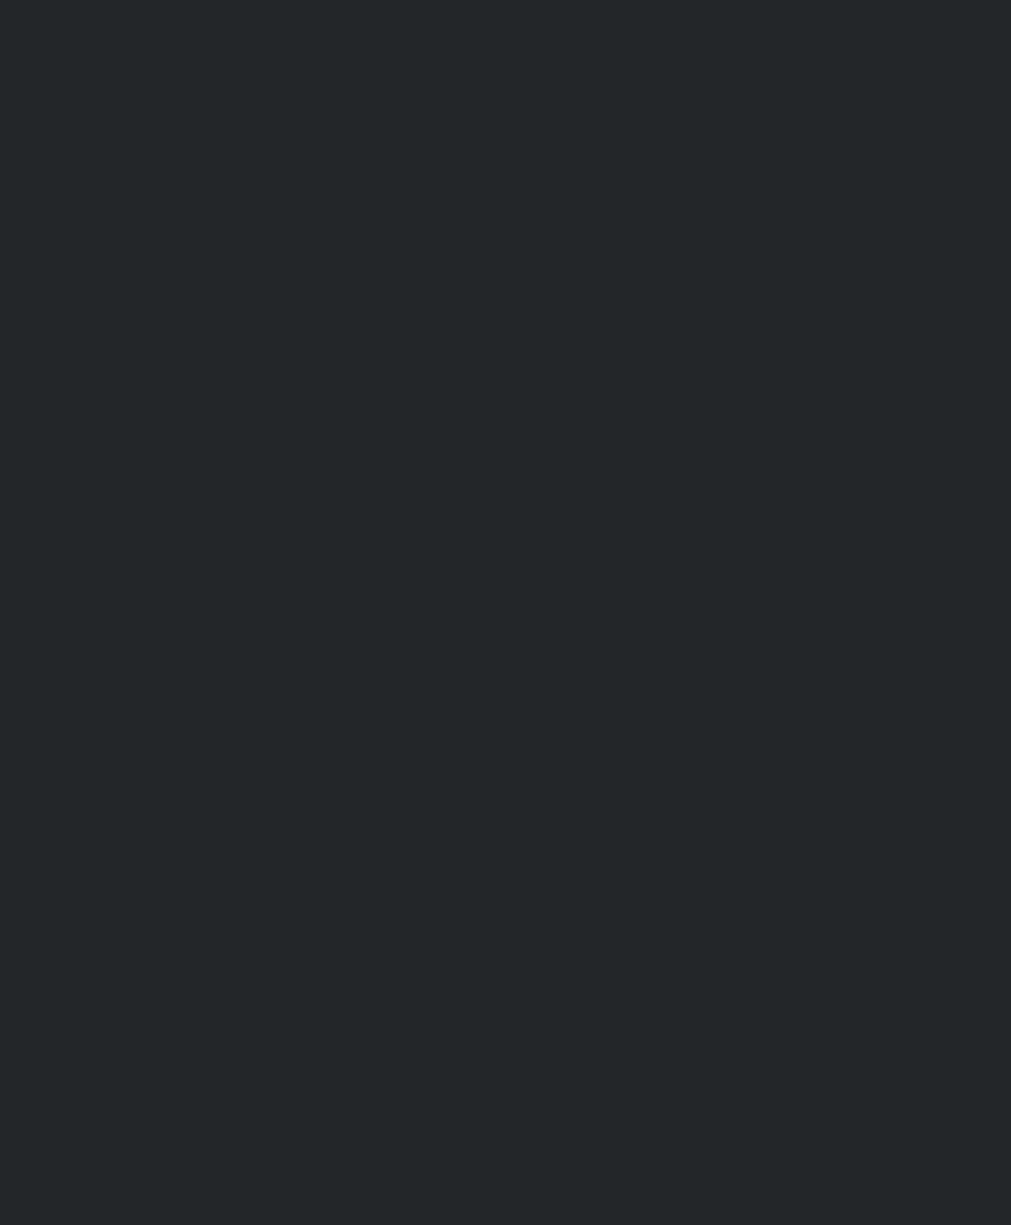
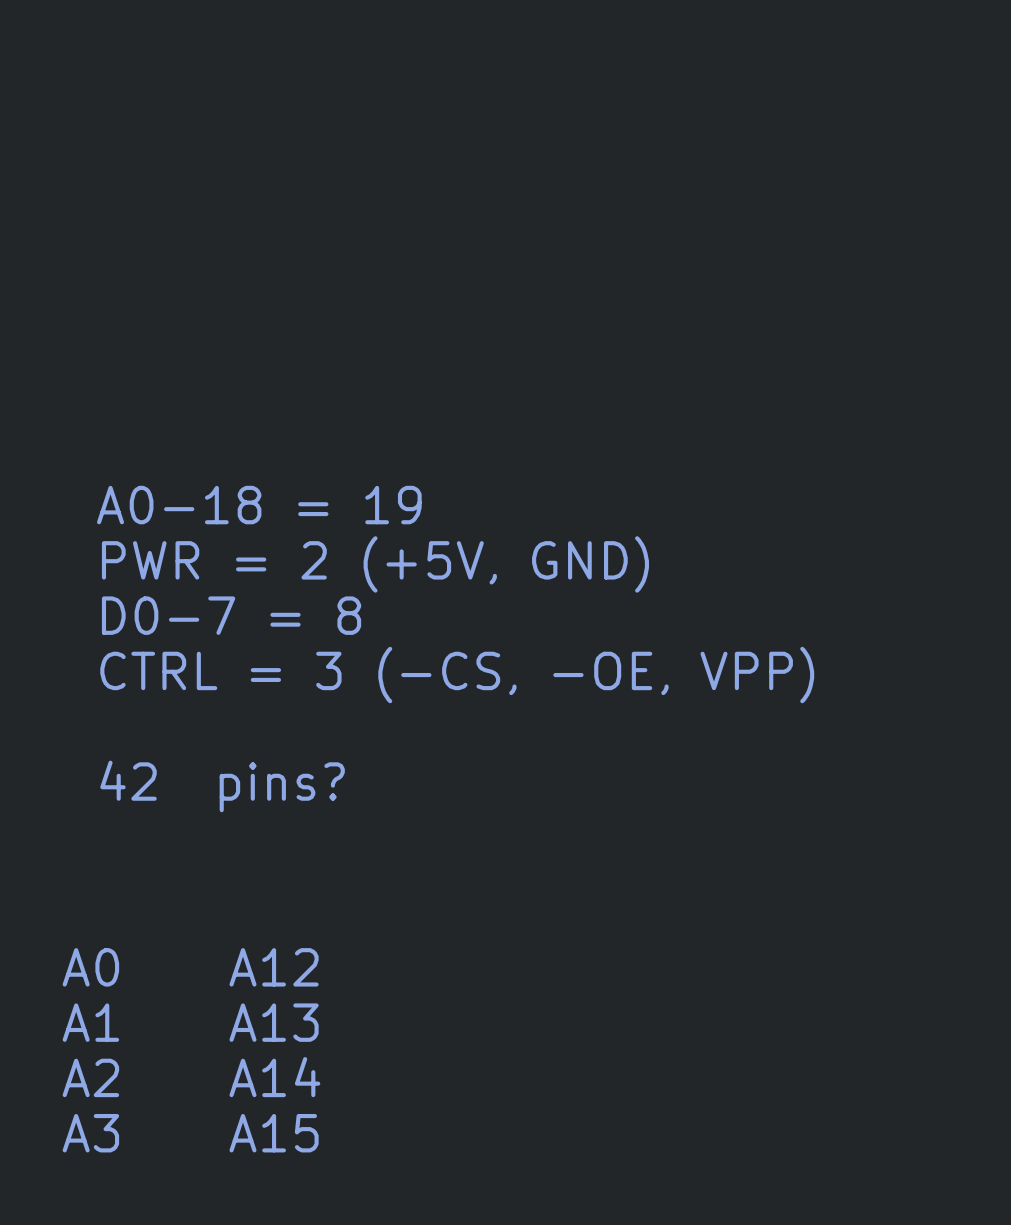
text: none -> A0-18 = 19 (259, 505)
text: none -> PWR = 2 (+5V, GND) (375, 564)
text: none -> D0-7 = 8 (231, 615)
text: none -> CTRL = 3 (-CS, -OE, VPP) (457, 675)
text: none -> 42 pins? (222, 786)
text: none -> A0 A12 (190, 967)
text: none -> A1 A13 (190, 1022)
text: none -> A2 A14 (191, 1077)
text: none -> A3 A15 (190, 1133)

